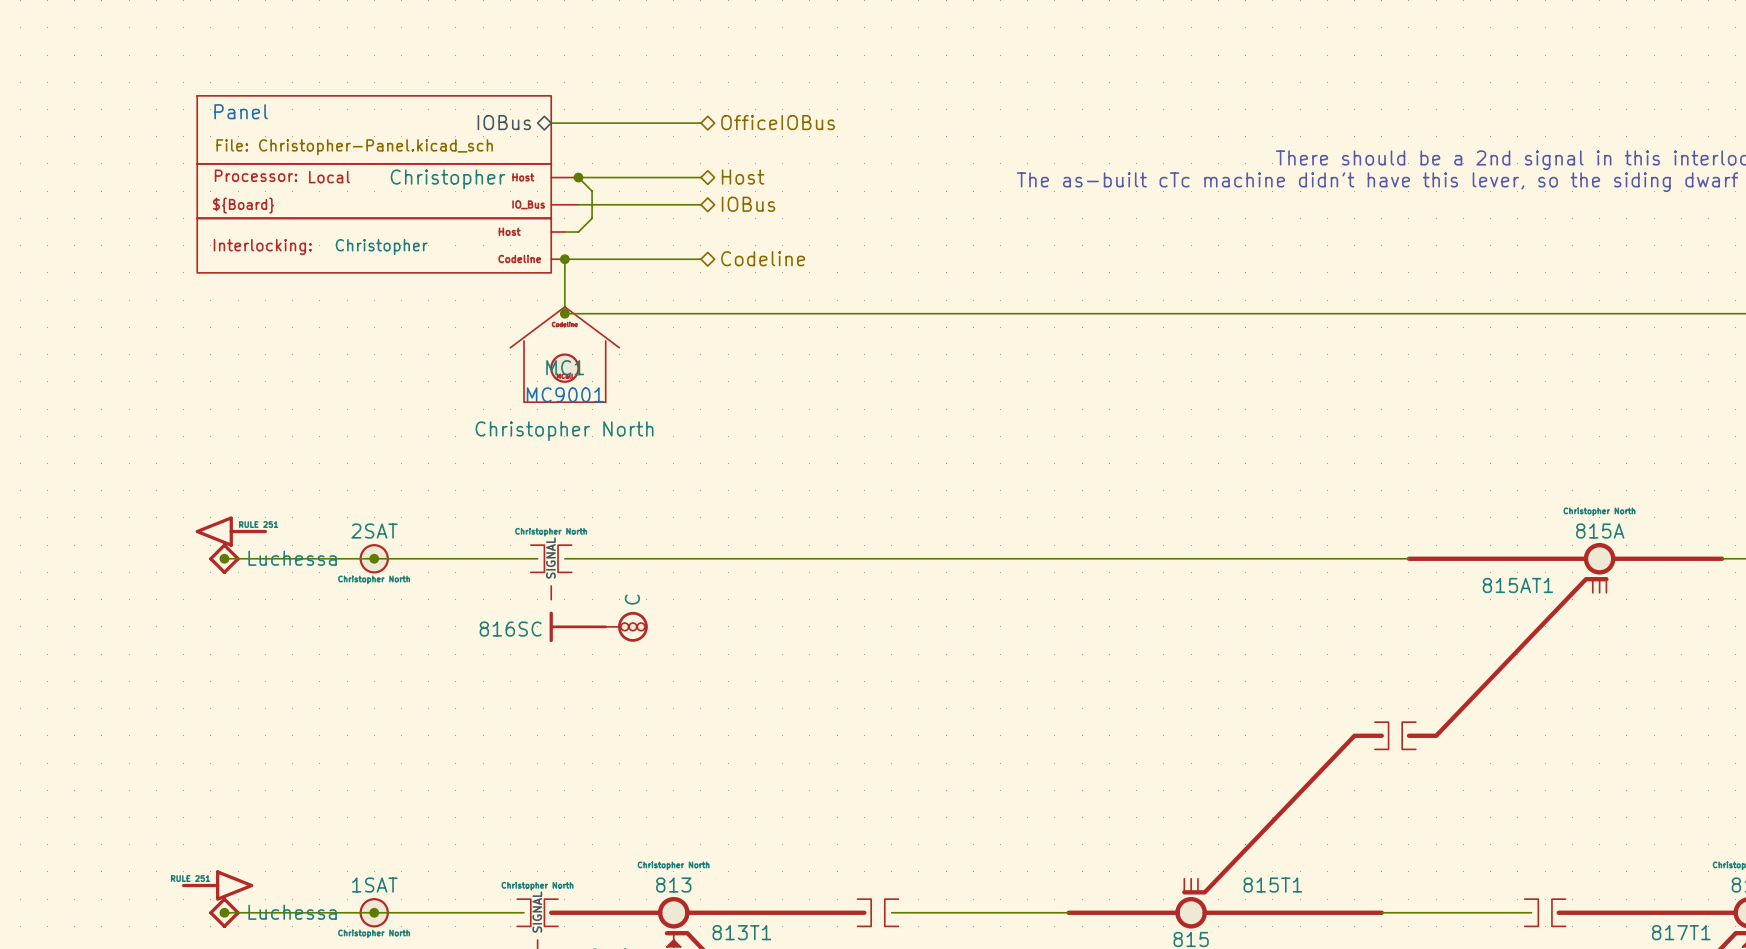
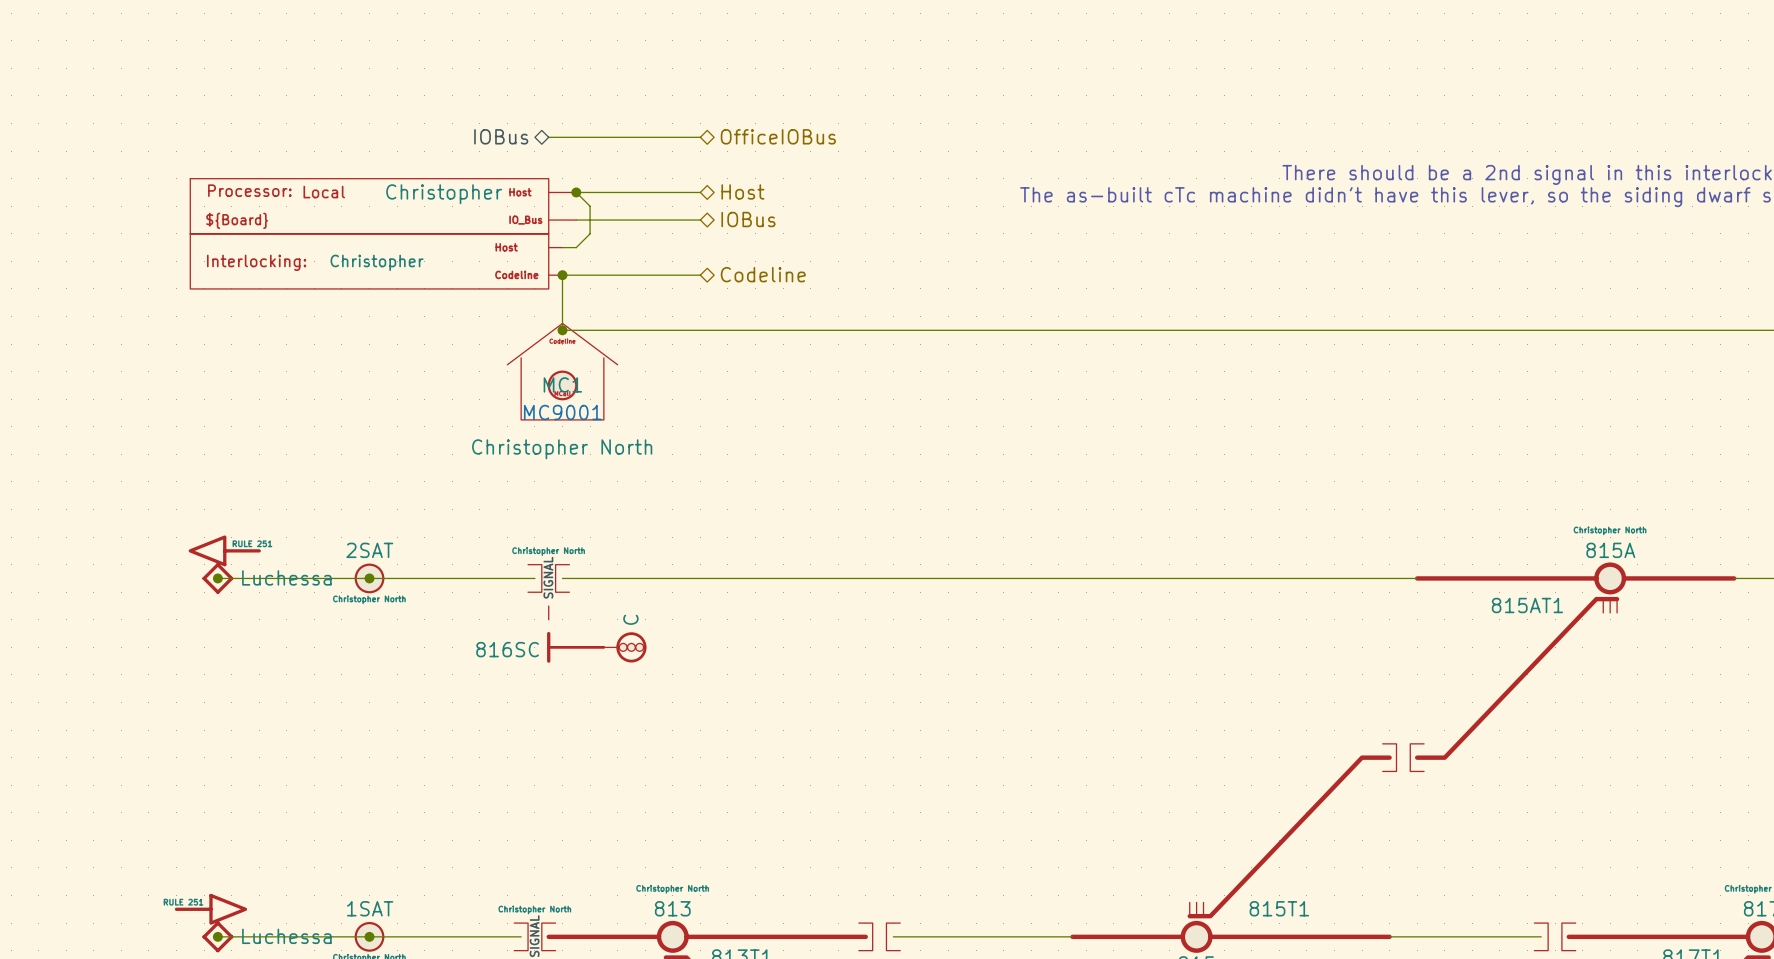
sheet Panel: File: Christopher-Panel.kicad_sch (374, 129) -> none

